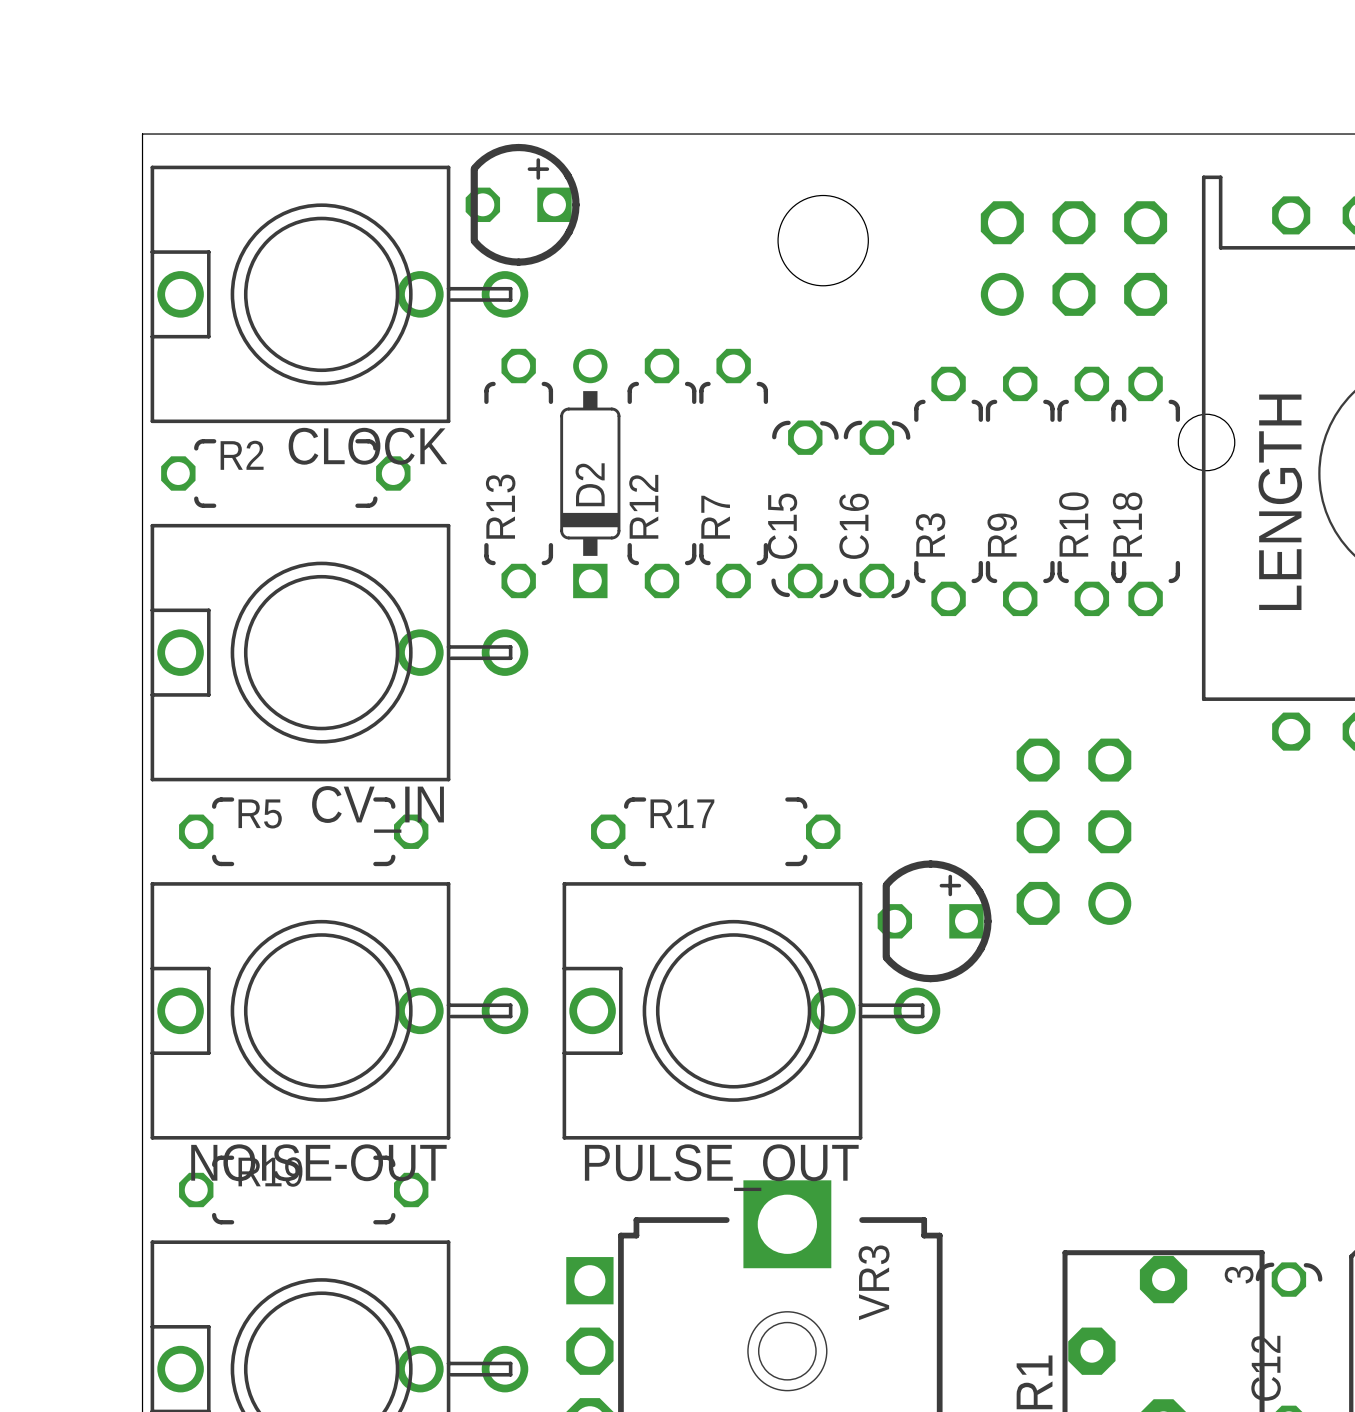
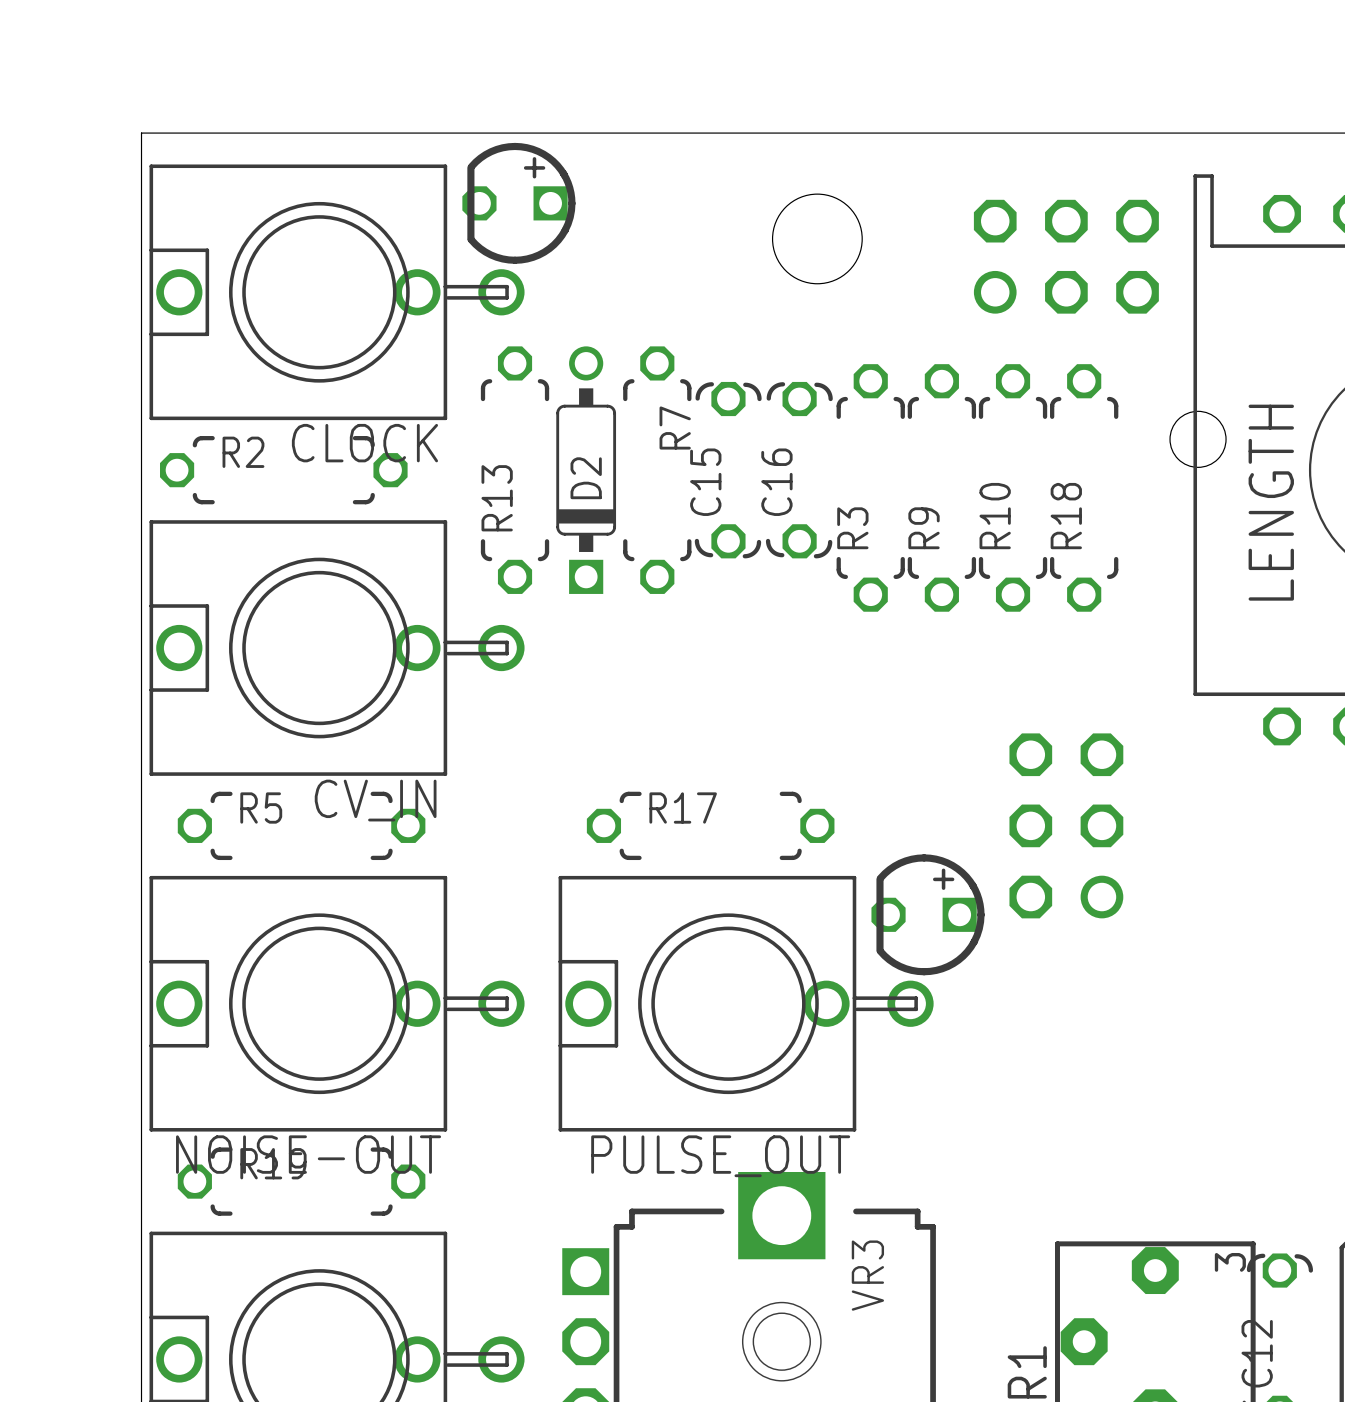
R7: (733, 473) -> none
R3: none -> (870, 487)
R18: (1145, 491) -> none
R12 name: R12 (643, 506) -> R7 (675, 428)
C15 position: (805, 509) -> (728, 470)
C16 position: (876, 509) -> (799, 470)
R10 name: R10 (1073, 524) -> R18 (1066, 516)
R3 name: R3 (930, 535) -> R9 (924, 528)
R9 name: R9 (1002, 535) -> R10 (995, 516)

